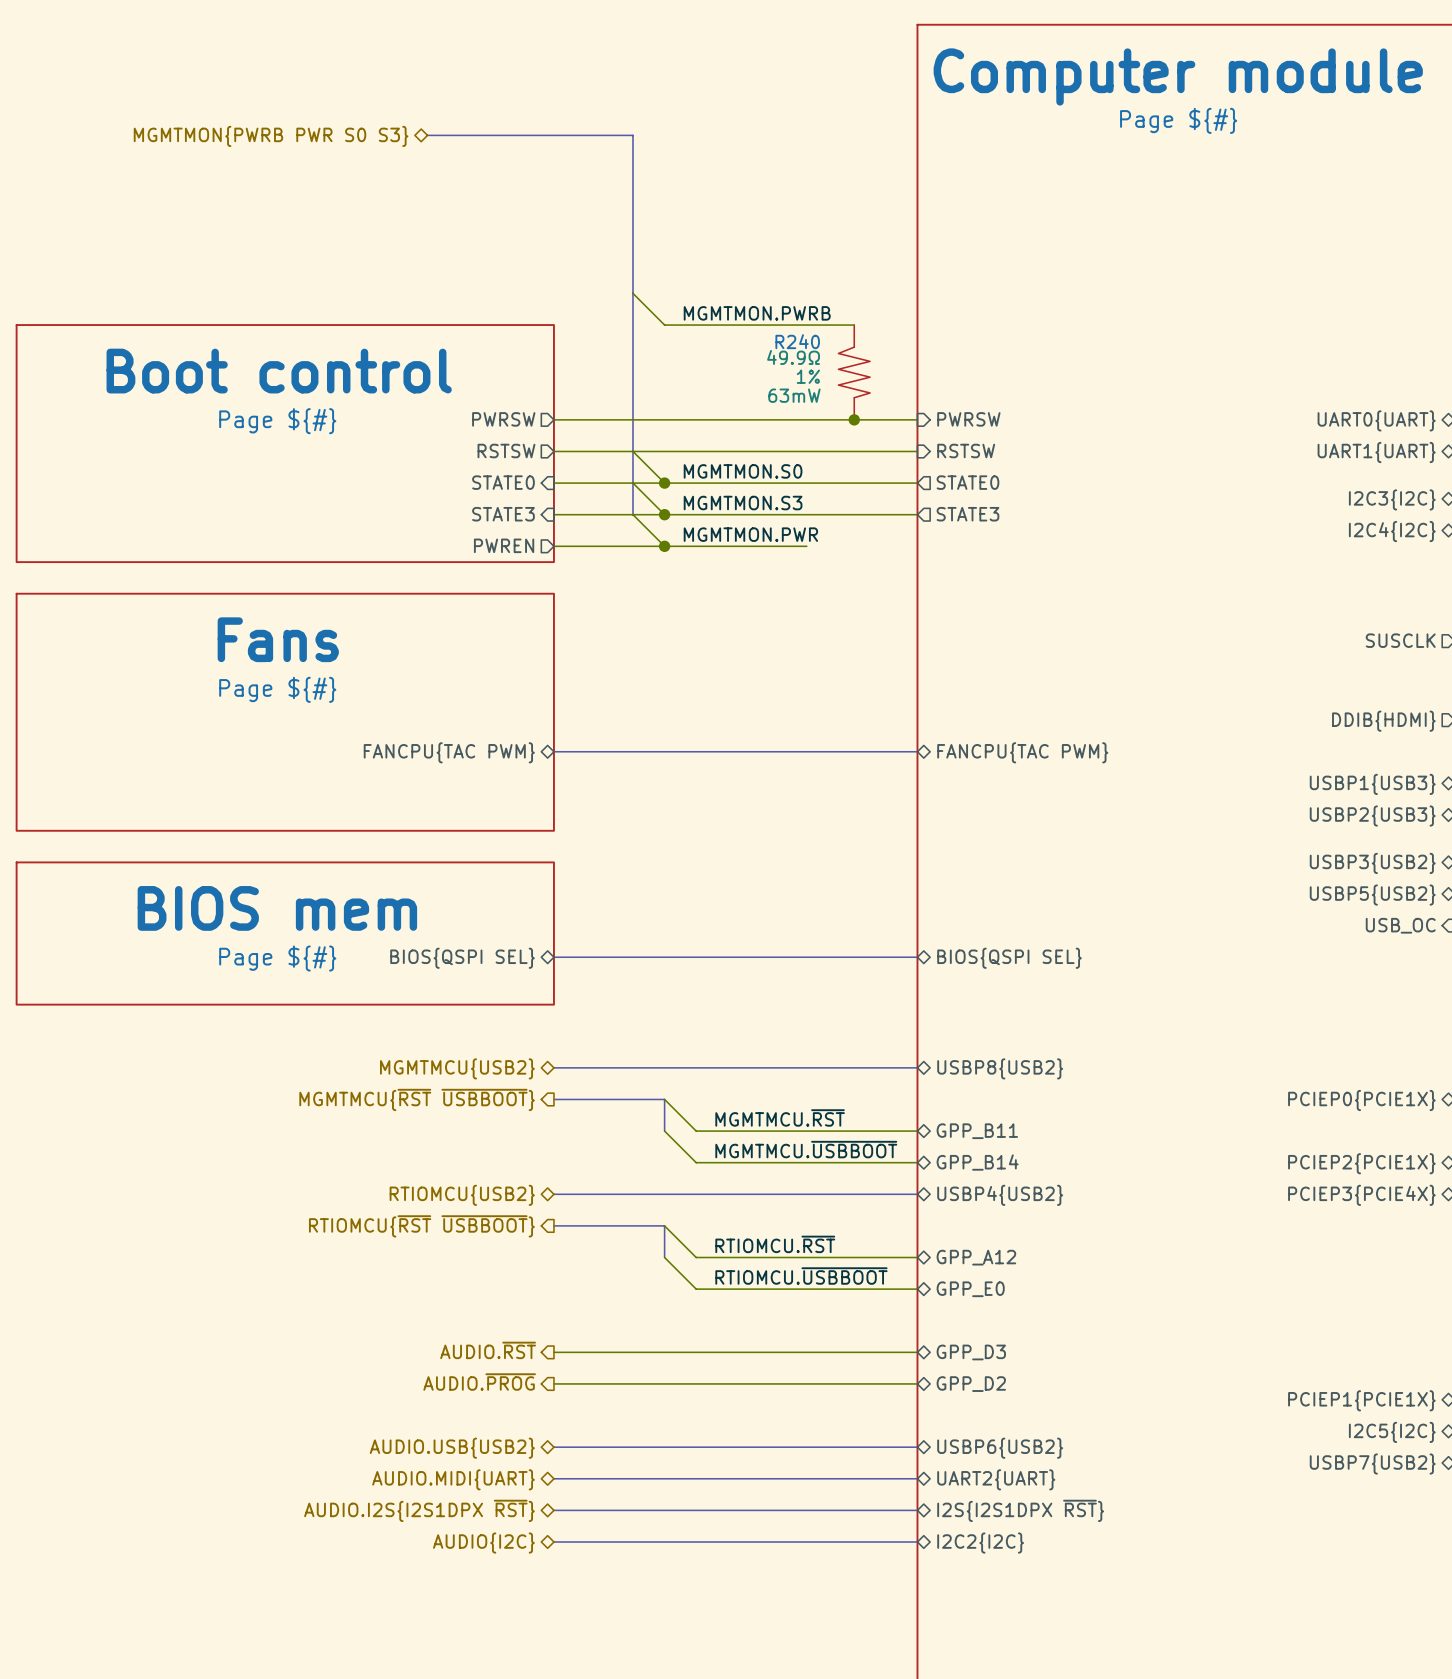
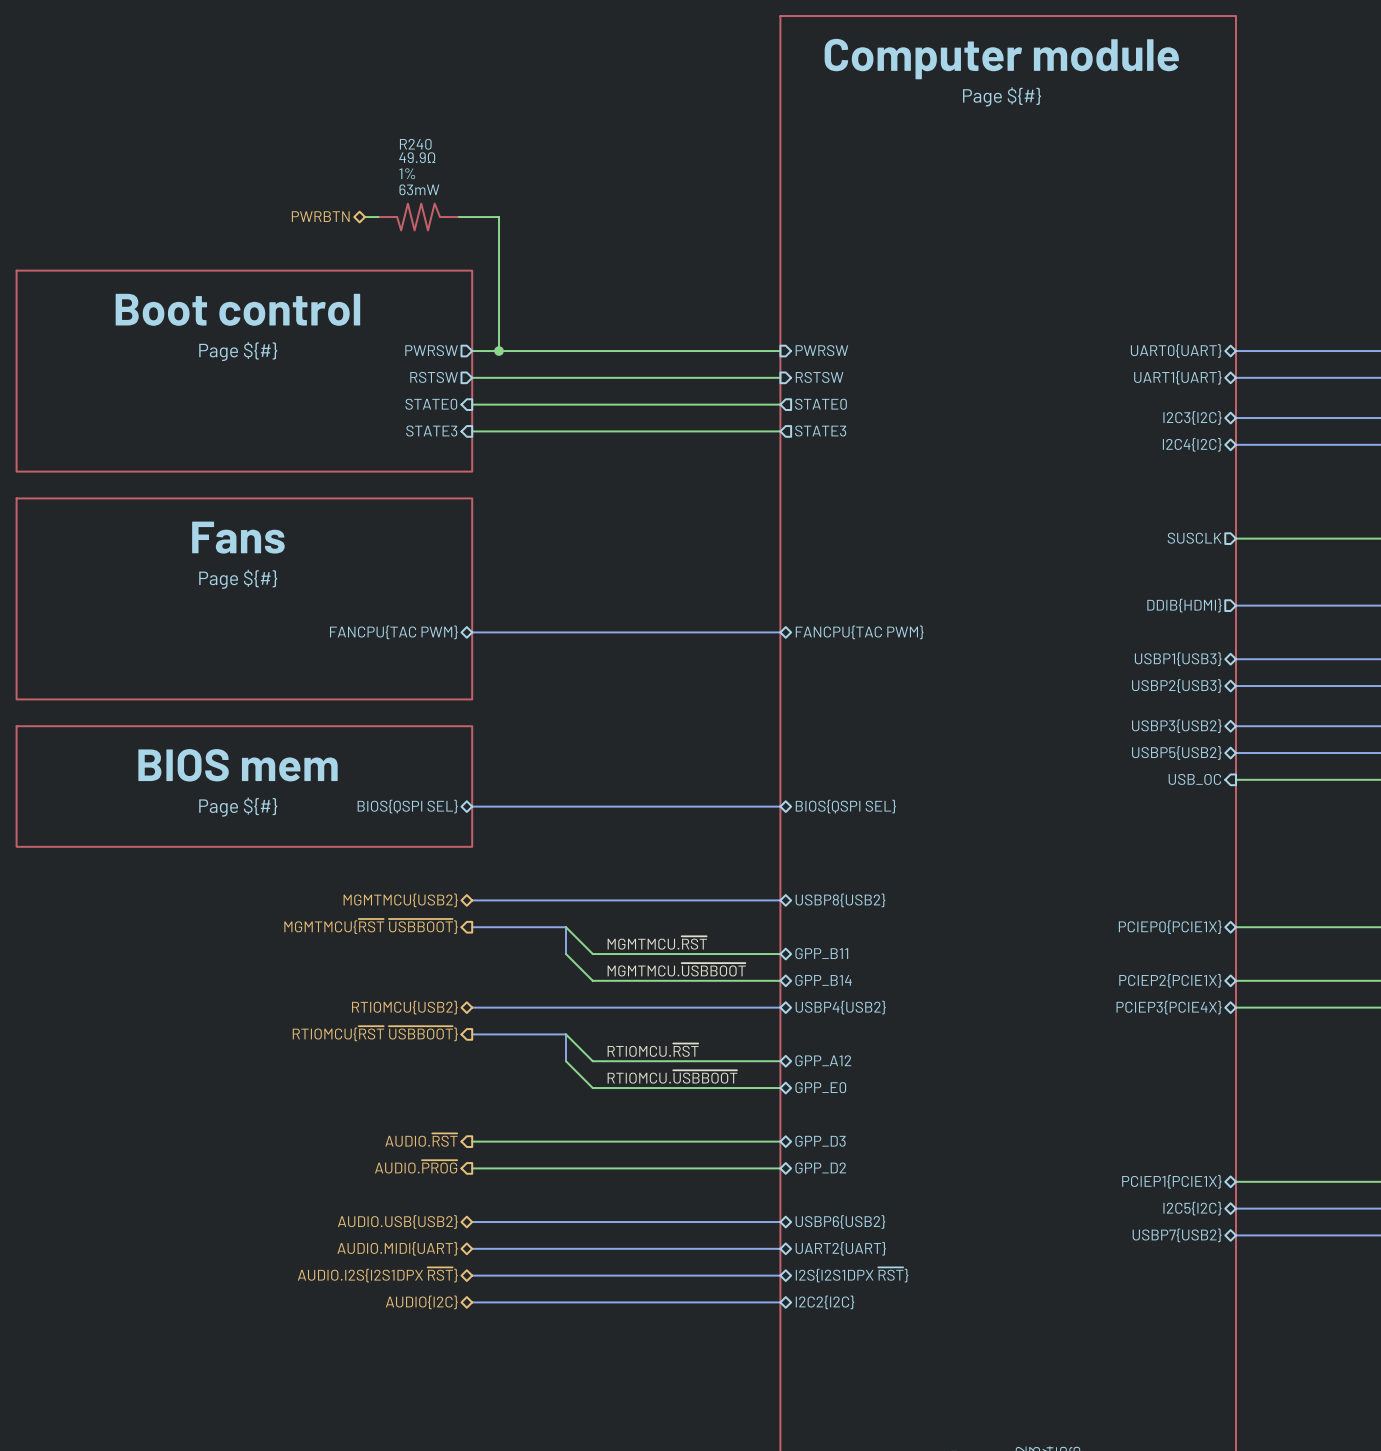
bus: (427, 135) (632, 135) (632, 514) -> none
hierarchical label: MGMTMON{PWRB PWR S0 S3} (271, 136) -> none
hierarchical label: none -> PWRBTN (320, 216)
wire: none -> (365, 217) (378, 217)
wire: none -> (458, 217) (499, 217) (499, 351)
wire: (632, 293) (664, 325) (854, 325) -> none
label: MGMTMON.PWRB (757, 313) -> none
R240 name position: R240 (797, 341) -> R240 (415, 144)
R240 rotation: 0° (854, 372) -> 90° clockwise (418, 217)
R240 position: (854, 372) -> (418, 217)
R240 text position: 63mW (794, 395) -> 63mW (419, 189)
junction: none -> (499, 351)
junction: (854, 419) -> none
wire: (632, 451) (664, 483) -> none
label: MGMTMON.S0 (743, 471) -> none
wire: (632, 483) (664, 514) -> none
junction: (664, 483) -> none
label: MGMTMON.S3 (743, 503) -> none
wire: (632, 514) (664, 546) -> none
junction: (664, 514) -> none
label: MGMTMON.PWR (750, 534) -> none
sheet pin: PWREN (504, 545) -> none
wire: (553, 546) (806, 546) -> none
junction: (664, 546) -> none

